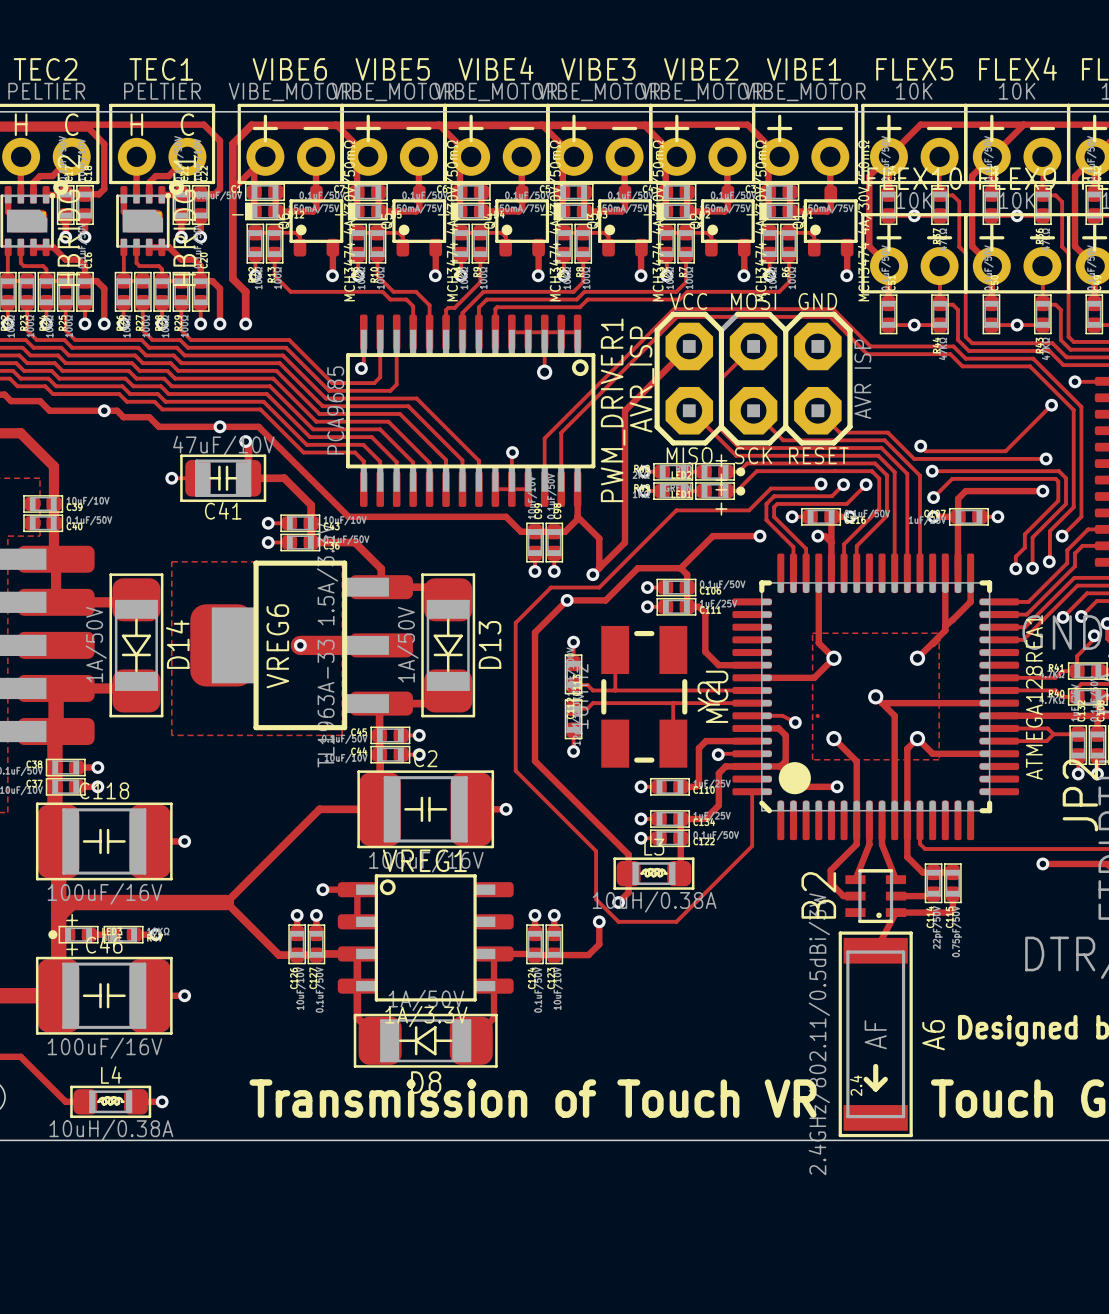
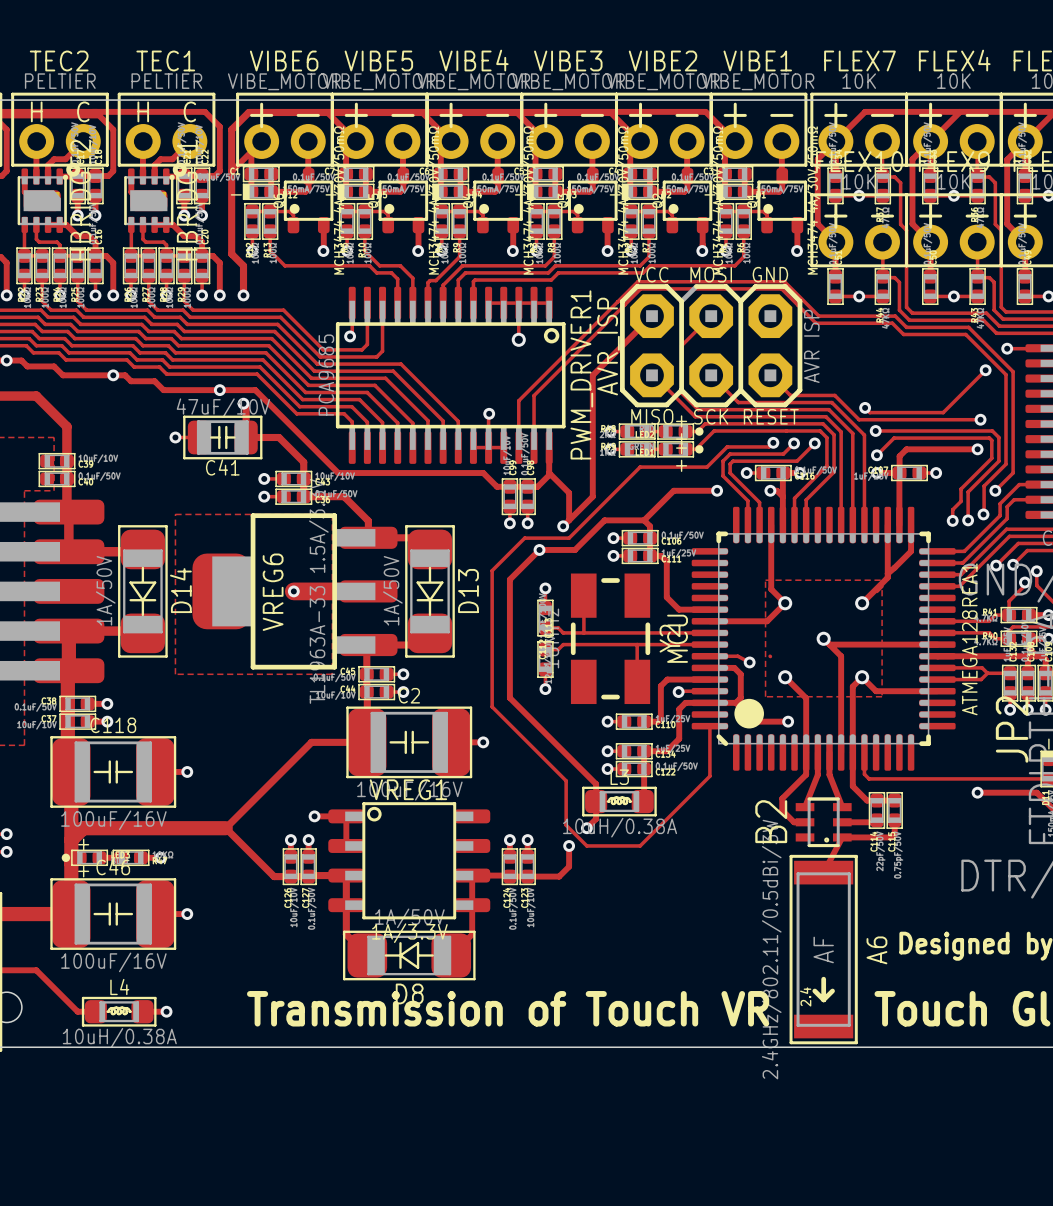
FLEX5 name: FLEX5 (914, 69) -> FLEX7 (860, 60)

